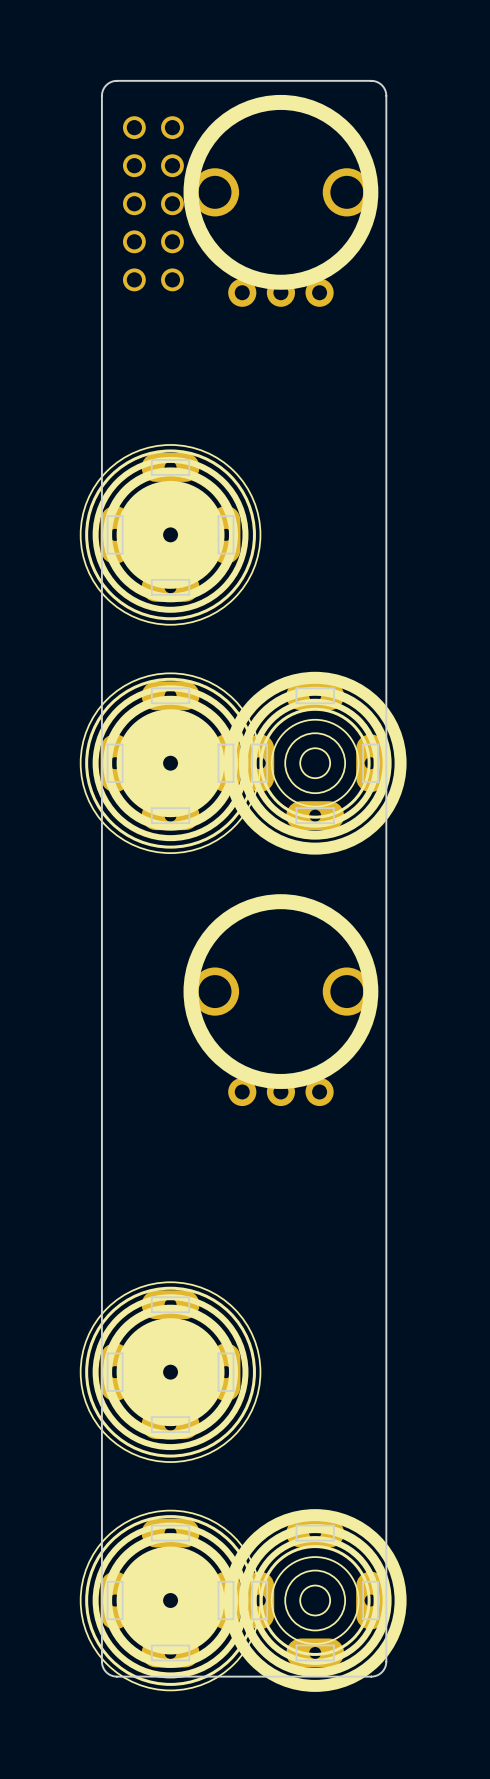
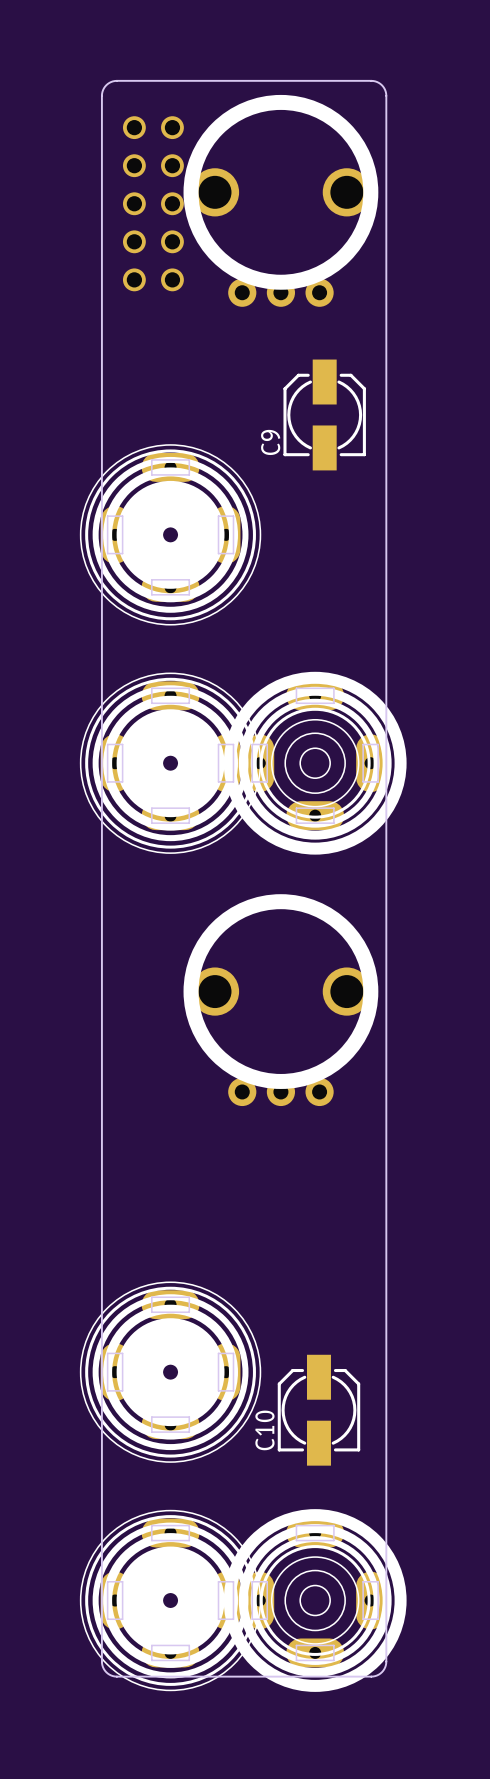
C9: none -> (324, 414)
C10: none -> (318, 1410)

